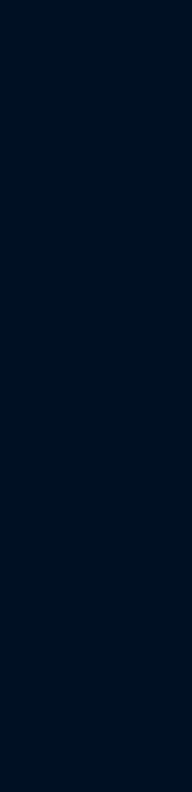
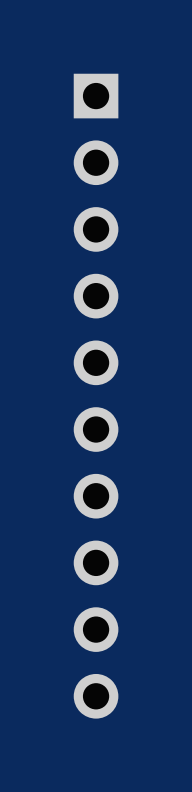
part: none -> (96, 396)

